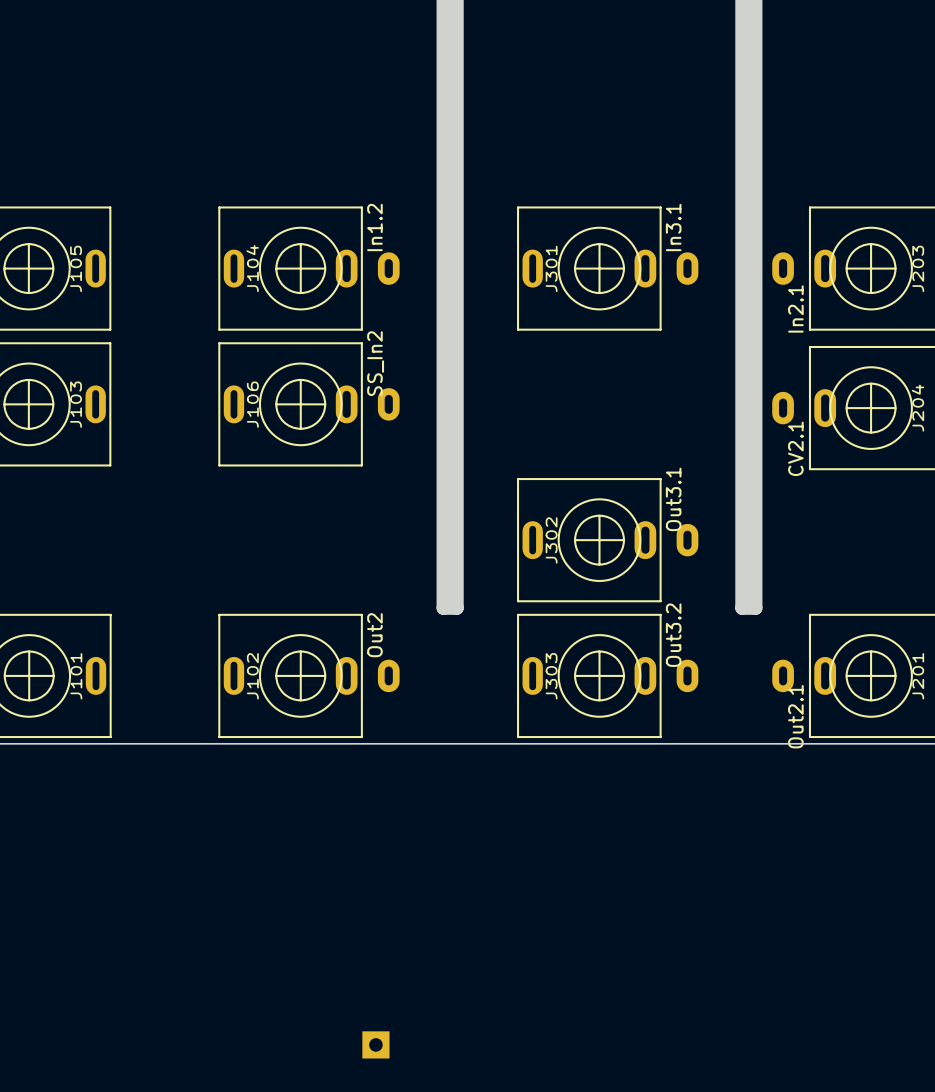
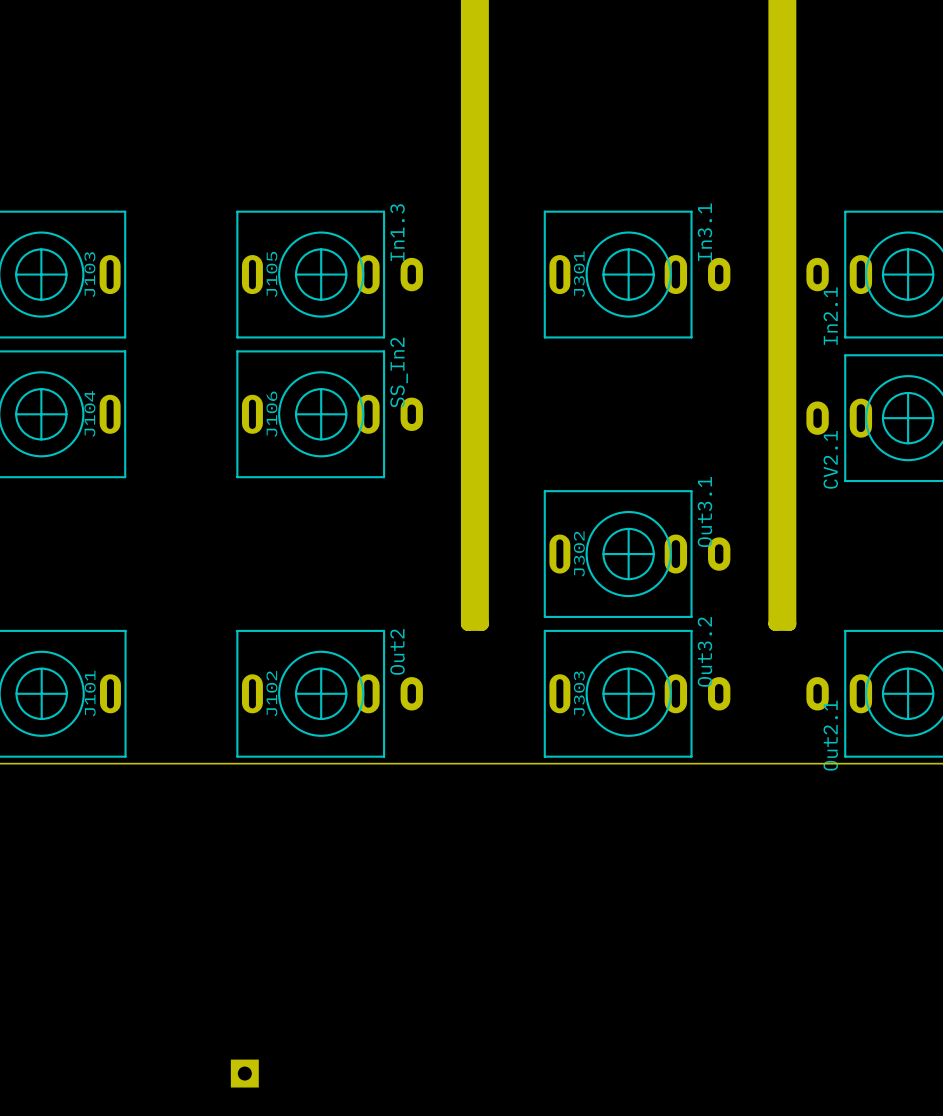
J104 value: In1.2 (374, 227) -> In1.3 (397, 232)
J105 name: J105 (76, 268) -> J103 (89, 274)
J104 name: J104 (252, 268) -> J105 (271, 274)
J103 name: J103 (76, 404) -> J104 (89, 413)
part: none -> (244, 1073)
part: (375, 1044) -> none

